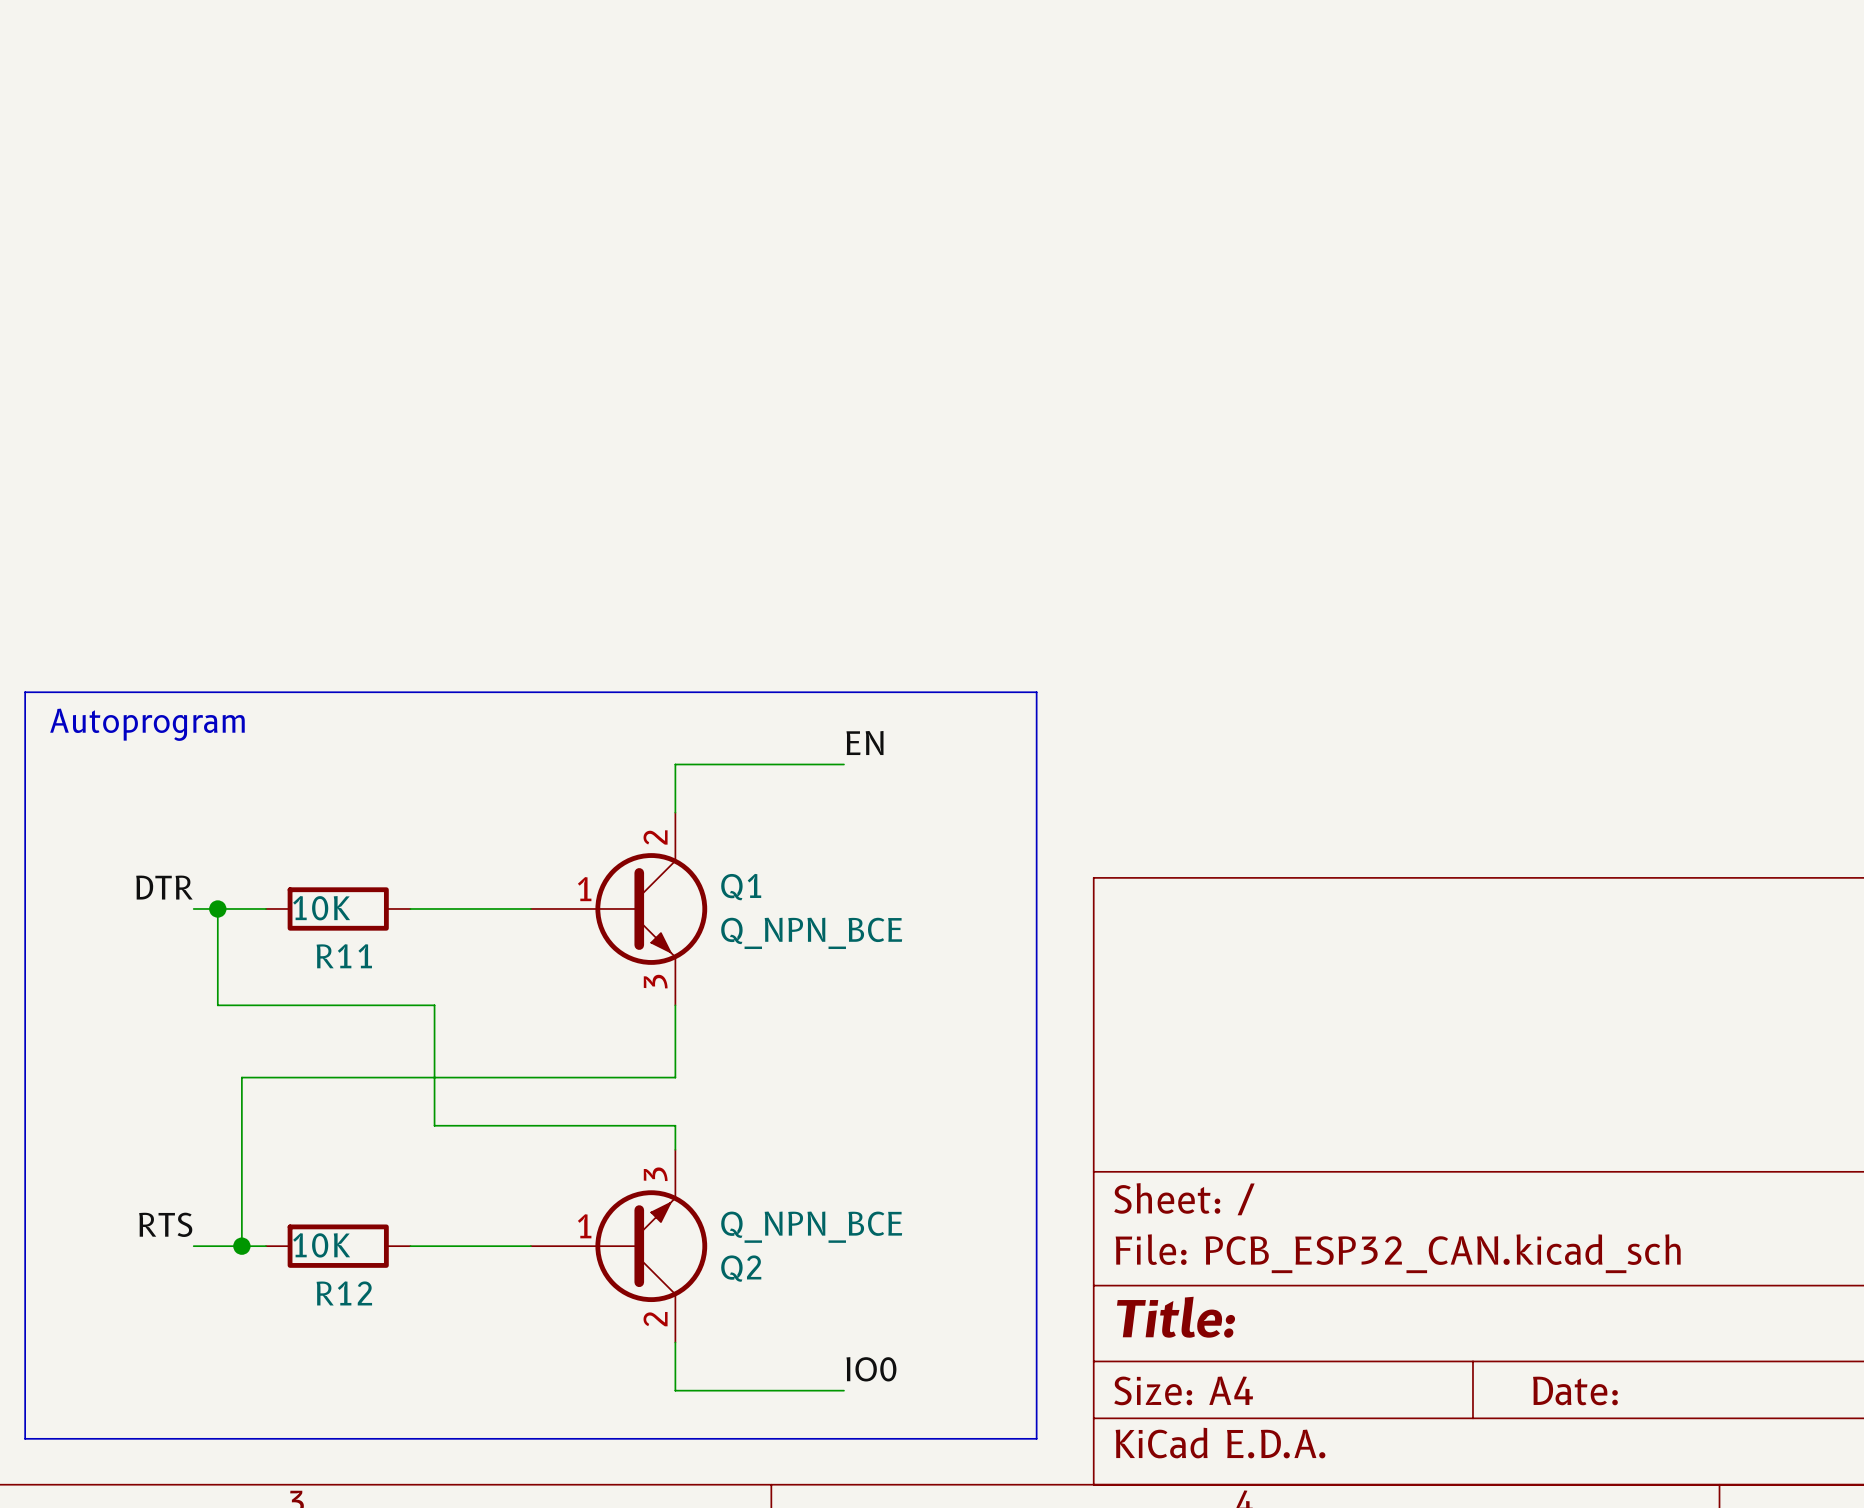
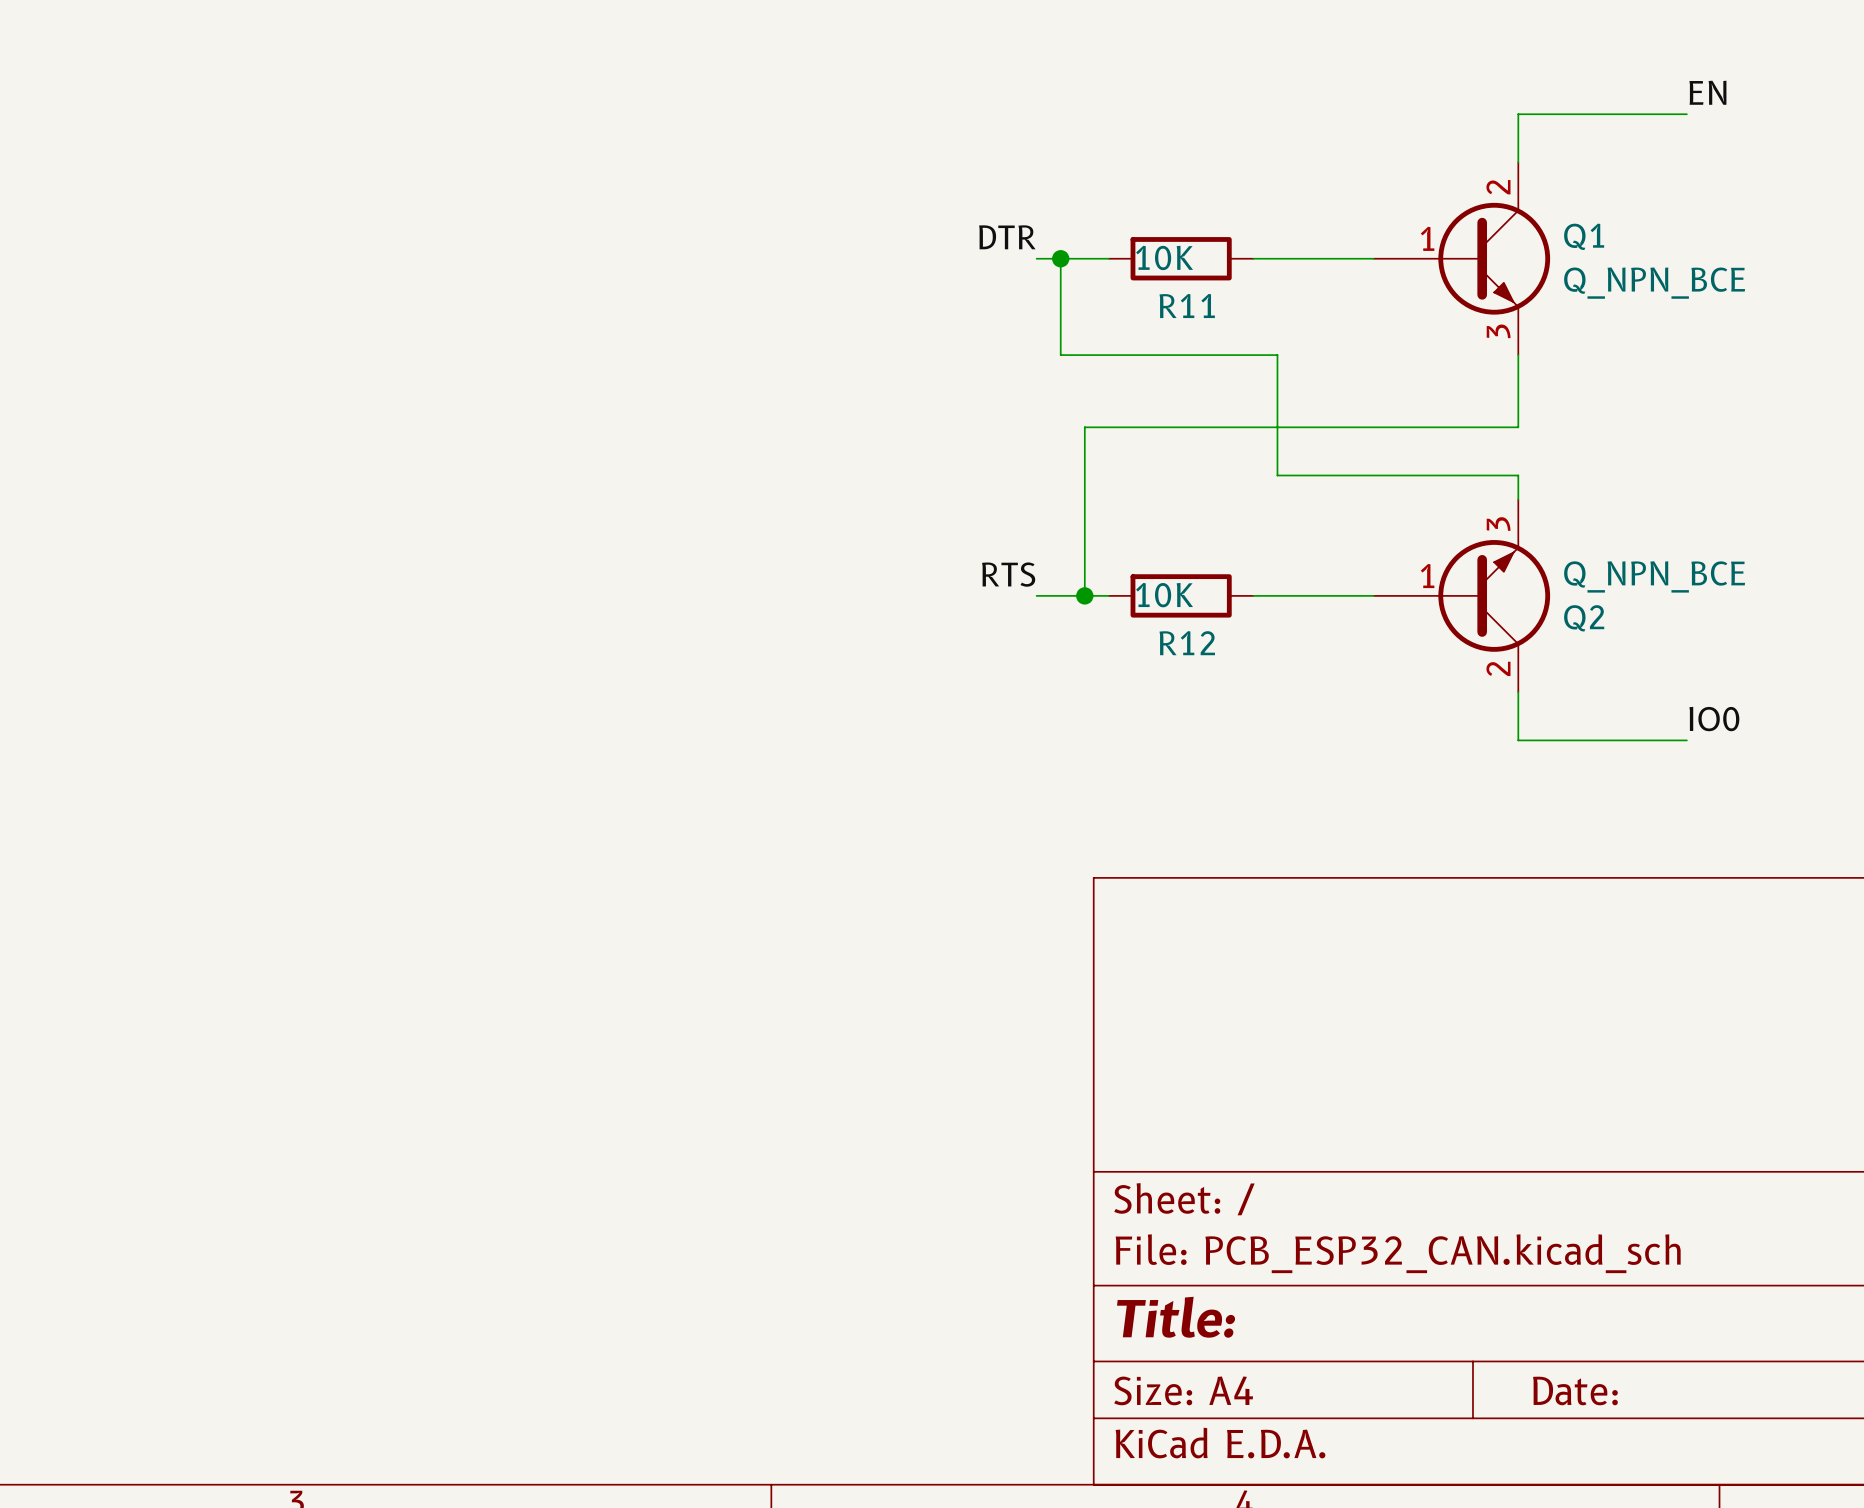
label: none -> EN (1707, 92)
wire: none -> (1686, 114) (1518, 114) (1518, 162)
label: none -> DTR (1007, 237)
wire: none -> (1036, 258) (1108, 258)
wire: none -> (1060, 258) (1060, 355) (1277, 355) (1277, 475) (1518, 475) (1518, 499)
junction: none -> (1060, 258)
wire: none -> (1253, 258) (1373, 258)
wire: none -> (1518, 355) (1518, 427) (1084, 427) (1084, 595)
label: none -> RTS (1008, 574)
wire: none -> (1036, 595) (1108, 595)
junction: none -> (1084, 595)
wire: none -> (1253, 595) (1373, 595)
line: (25, 692) (1036, 692) (1036, 1438) (25, 1438) (25, 692) -> none
wire: none -> (1518, 692) (1518, 740) (1686, 740)
label: none -> IO0 (1714, 719)
text: Autoprogram (147, 724) -> none
label: EN (865, 743) -> none
wire: (843, 764) (675, 764) (675, 812) -> none
label: DTR (164, 887) -> none
wire: (193, 908) (265, 908) -> none
wire: (217, 908) (217, 1005) (434, 1005) (434, 1125) (675, 1125) (675, 1149) -> none
junction: (217, 908) -> none
R11 position: (338, 908) -> (1181, 258)
wire: (410, 908) (530, 908) -> none
Q1 position: (619, 908) -> (1461, 258)
wire: (675, 1005) (675, 1077) (241, 1077) (241, 1246) -> none
label: RTS (165, 1224) -> none
wire: (193, 1246) (265, 1246) -> none
junction: (241, 1246) -> none
R12 position: (338, 1246) -> (1181, 595)
wire: (410, 1246) (530, 1246) -> none
Q2 position: (619, 1246) -> (1461, 595)
wire: (675, 1342) (675, 1390) (843, 1390) -> none
label: IO0 (871, 1369) -> none

